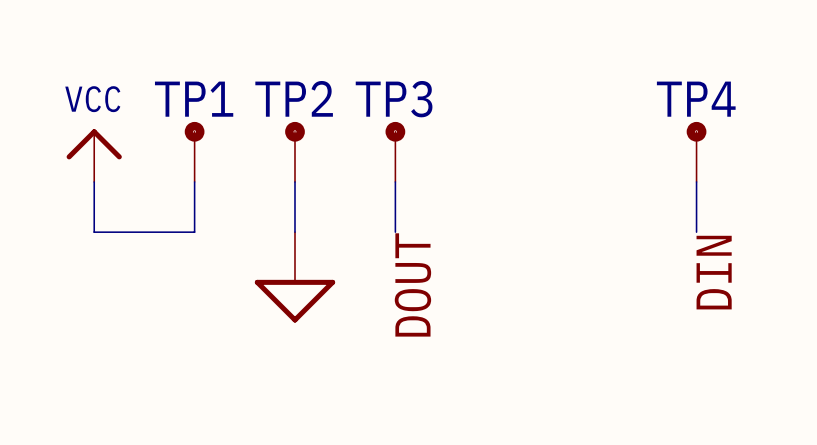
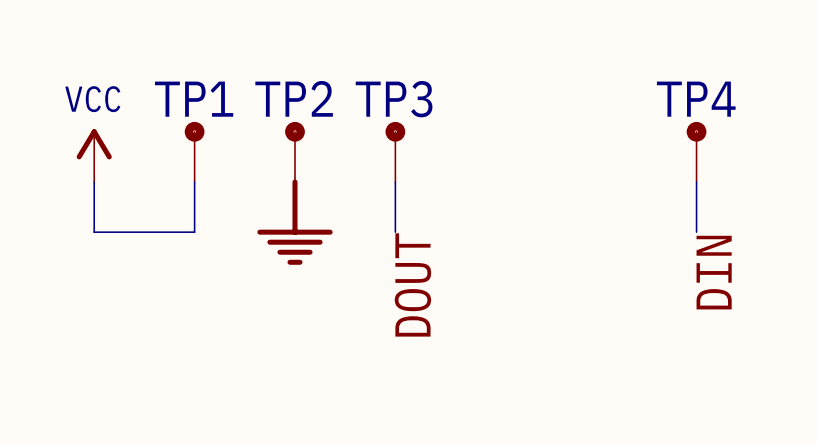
power symbol shape: [66, 129, 122, 182] -> [76, 129, 112, 182]
power symbol: none -> (294, 222)
power symbol: (294, 277) -> none

